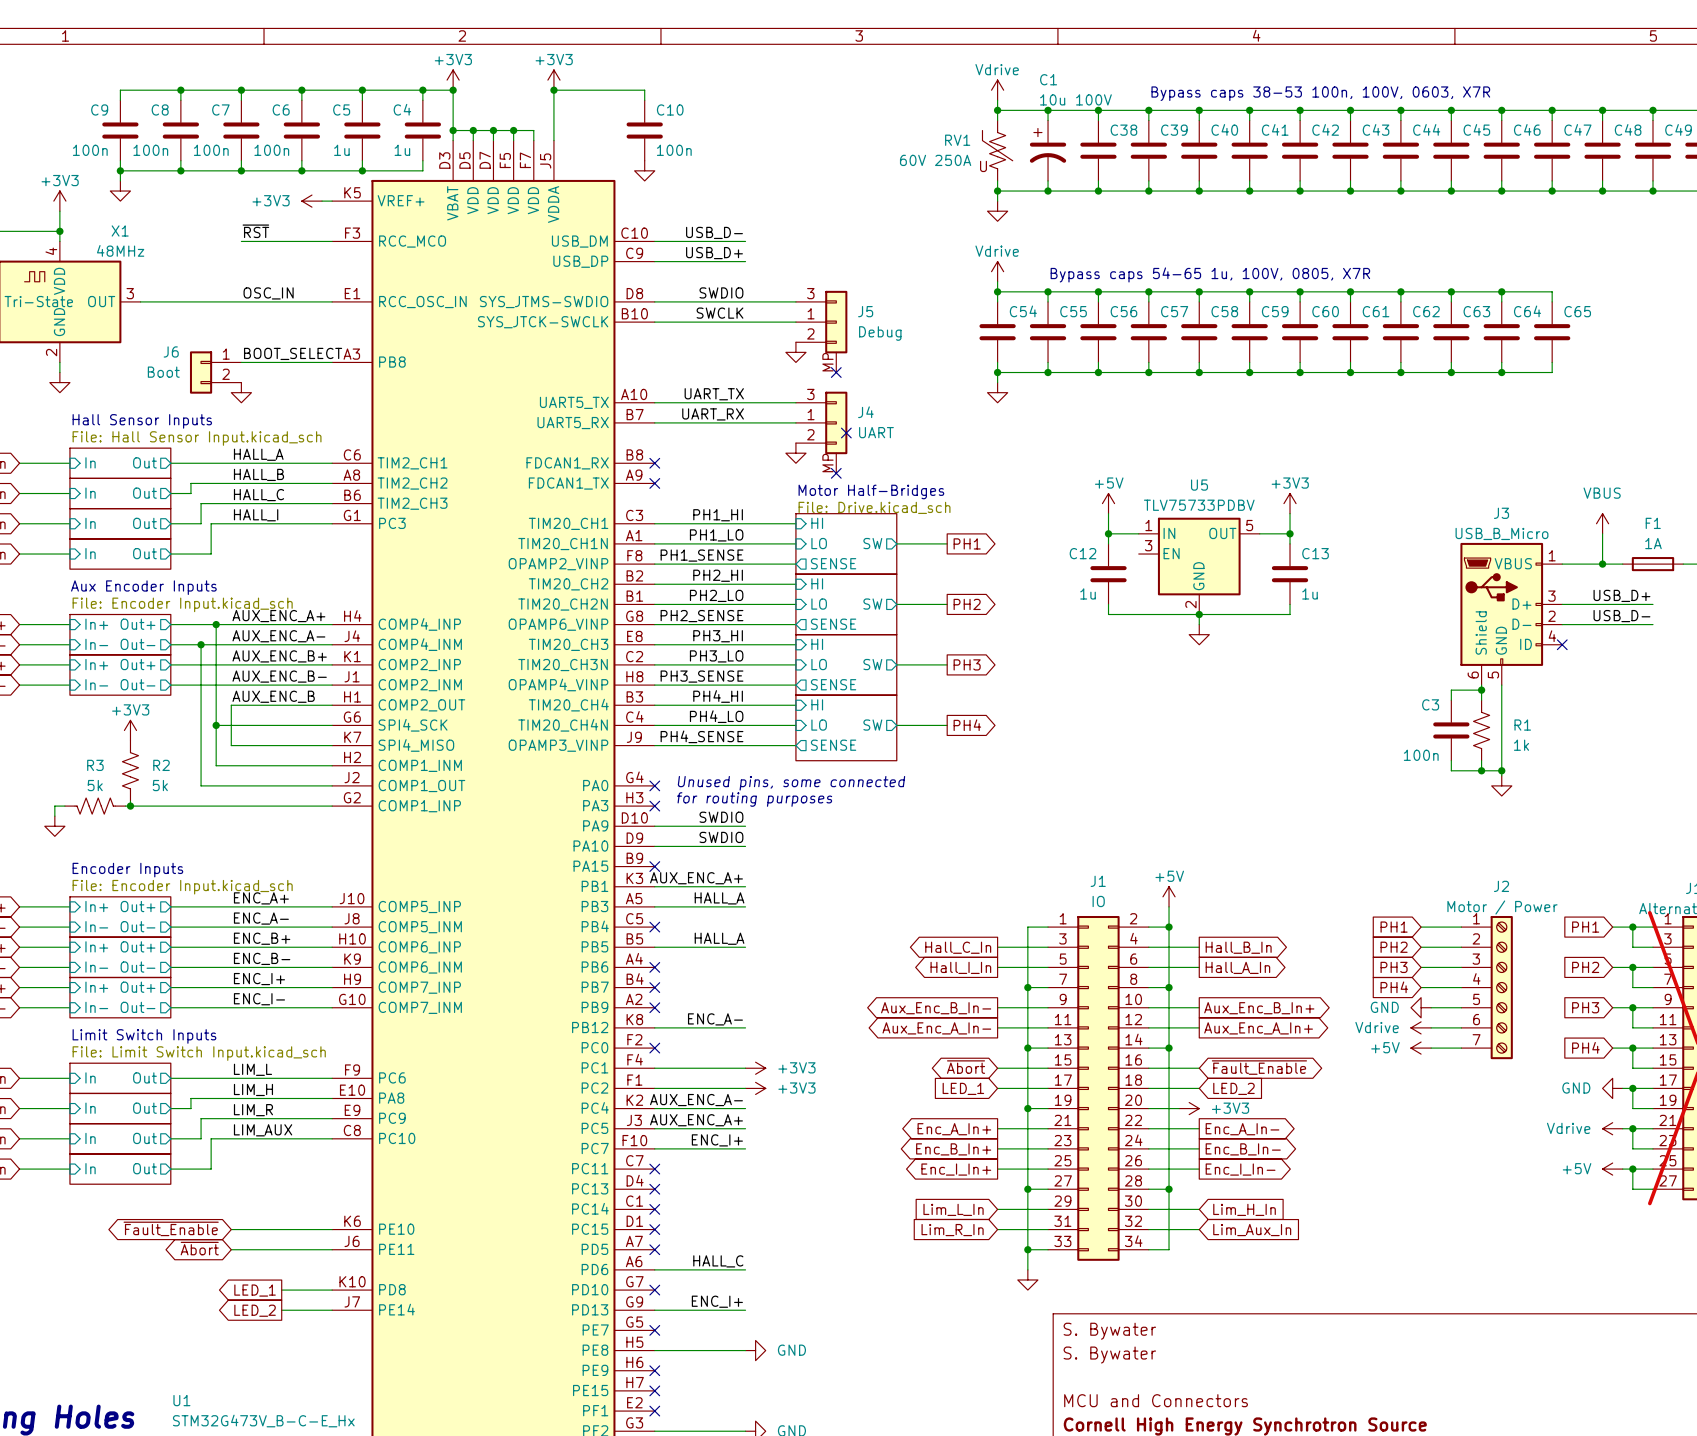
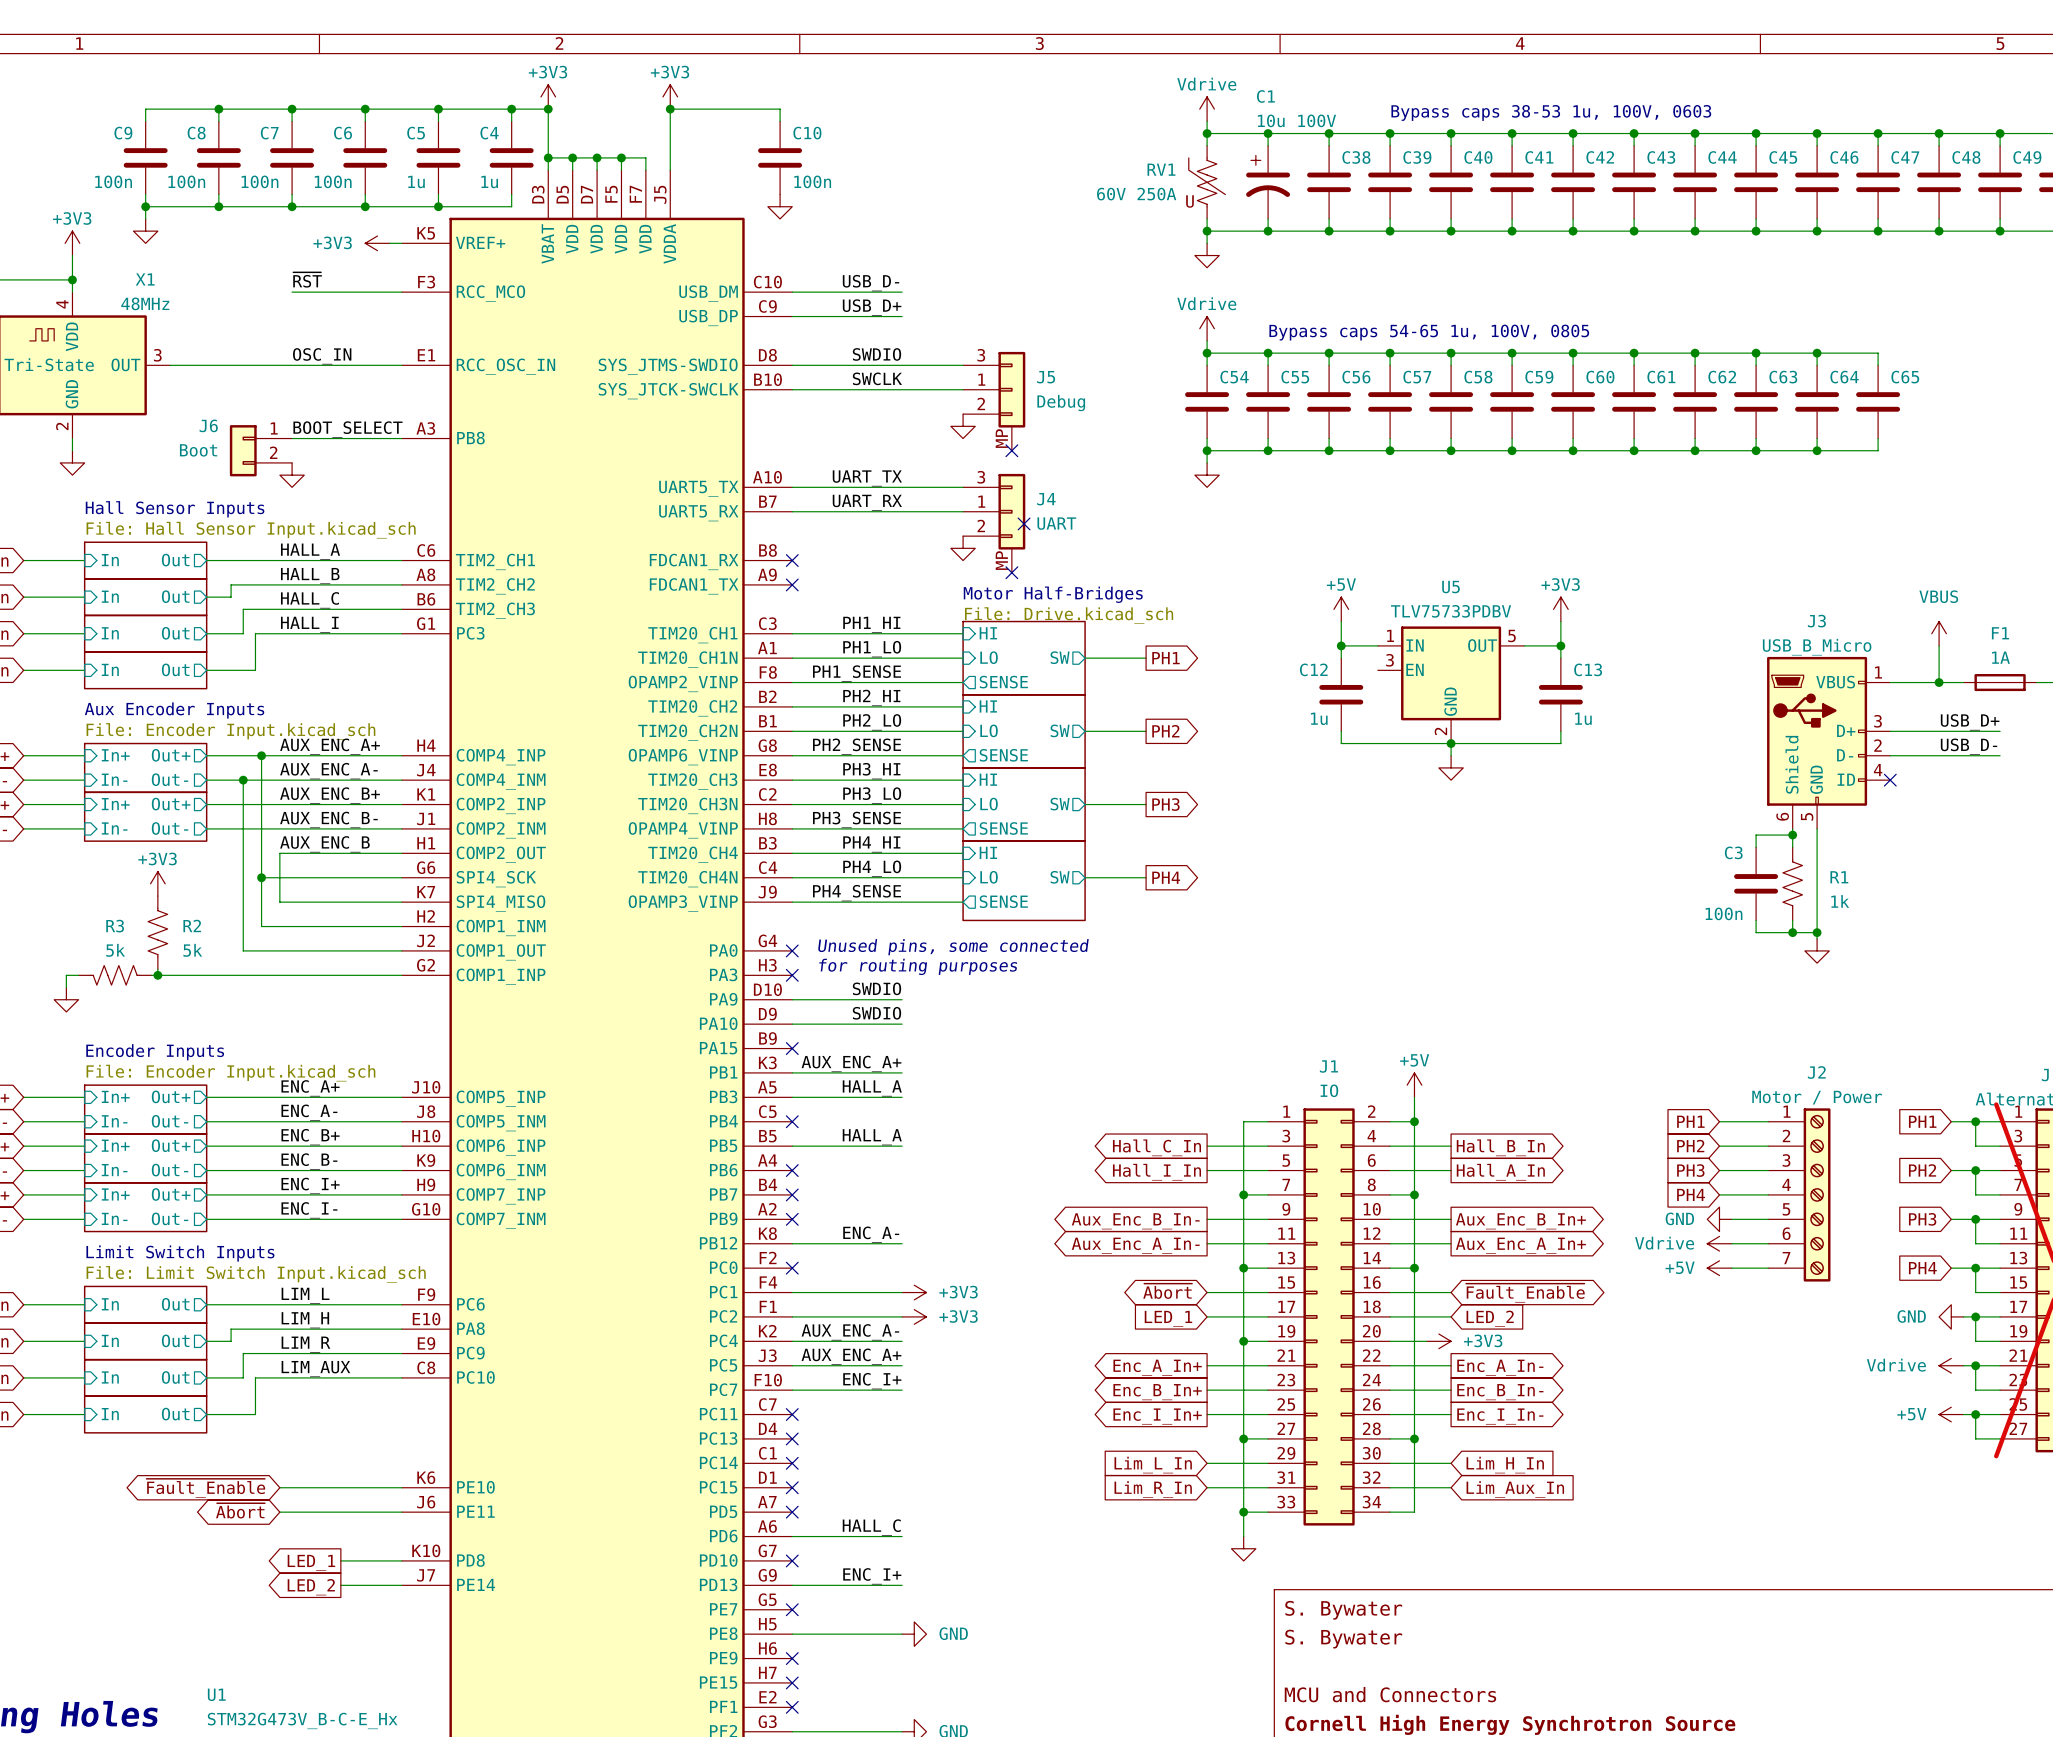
text: Bypass caps 38-53 100n, 100V, 0603, X7R (1320, 93) -> Bypass caps 38-53 1u, 100V, 0603 (1551, 112)
text: Bypass caps 54-65 1u, 100V, 0805, X7R (1210, 274) -> Bypass caps 54-65 1u, 100V, 0805 (1429, 332)

